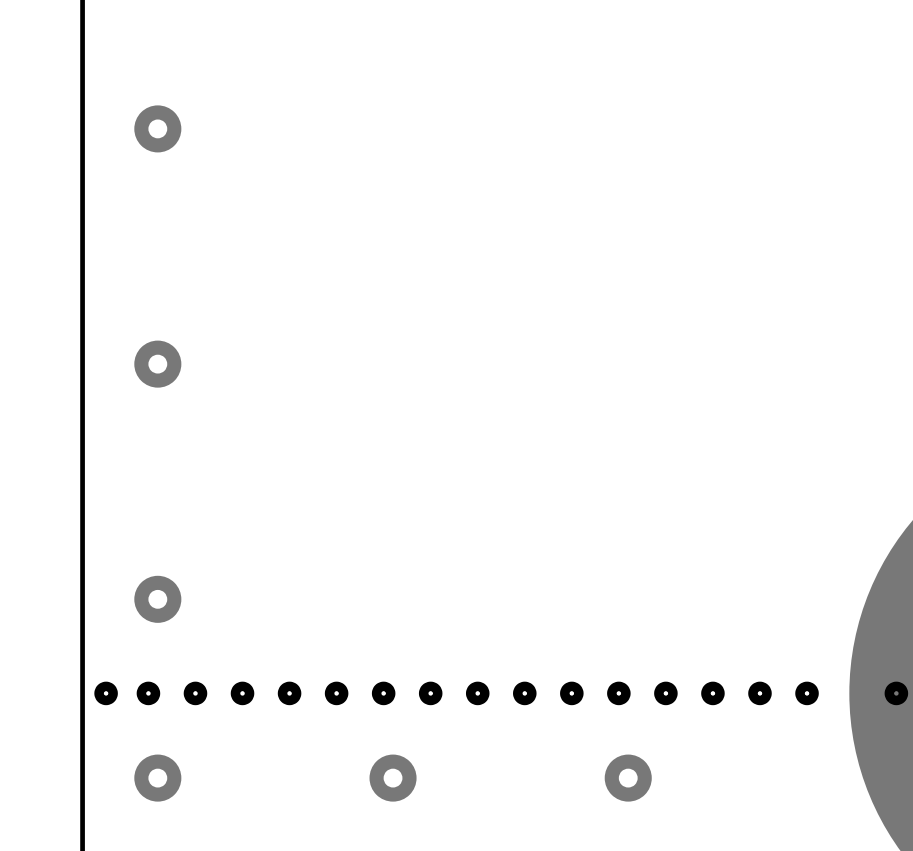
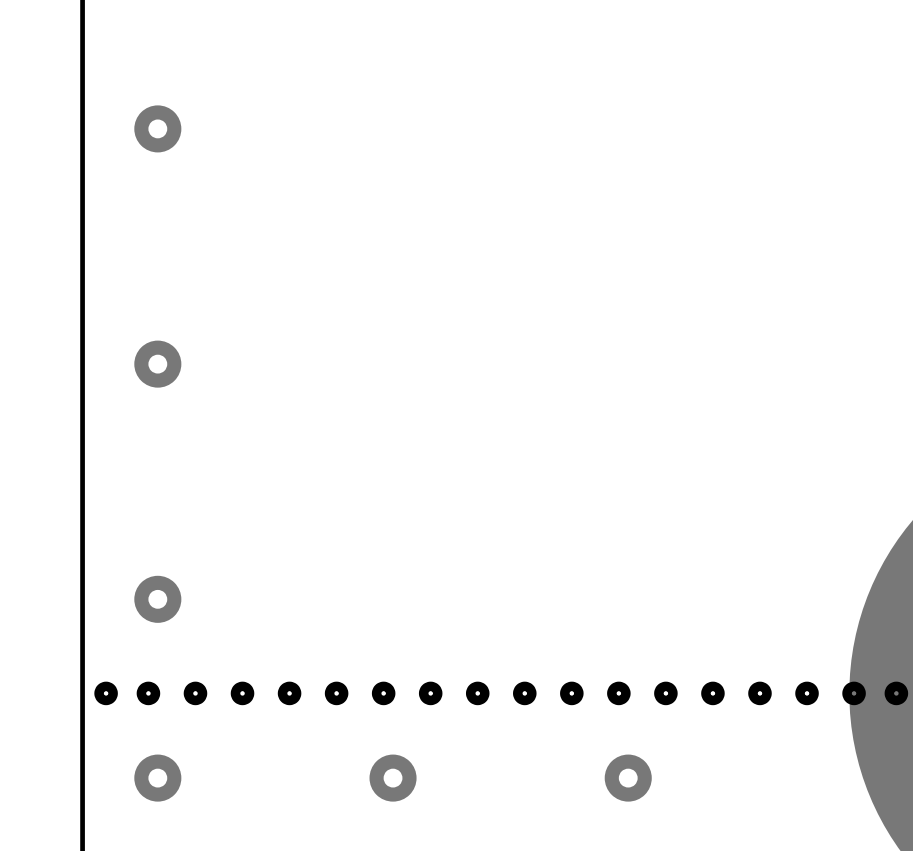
round board edge: none -> [842, 681, 866, 706]

